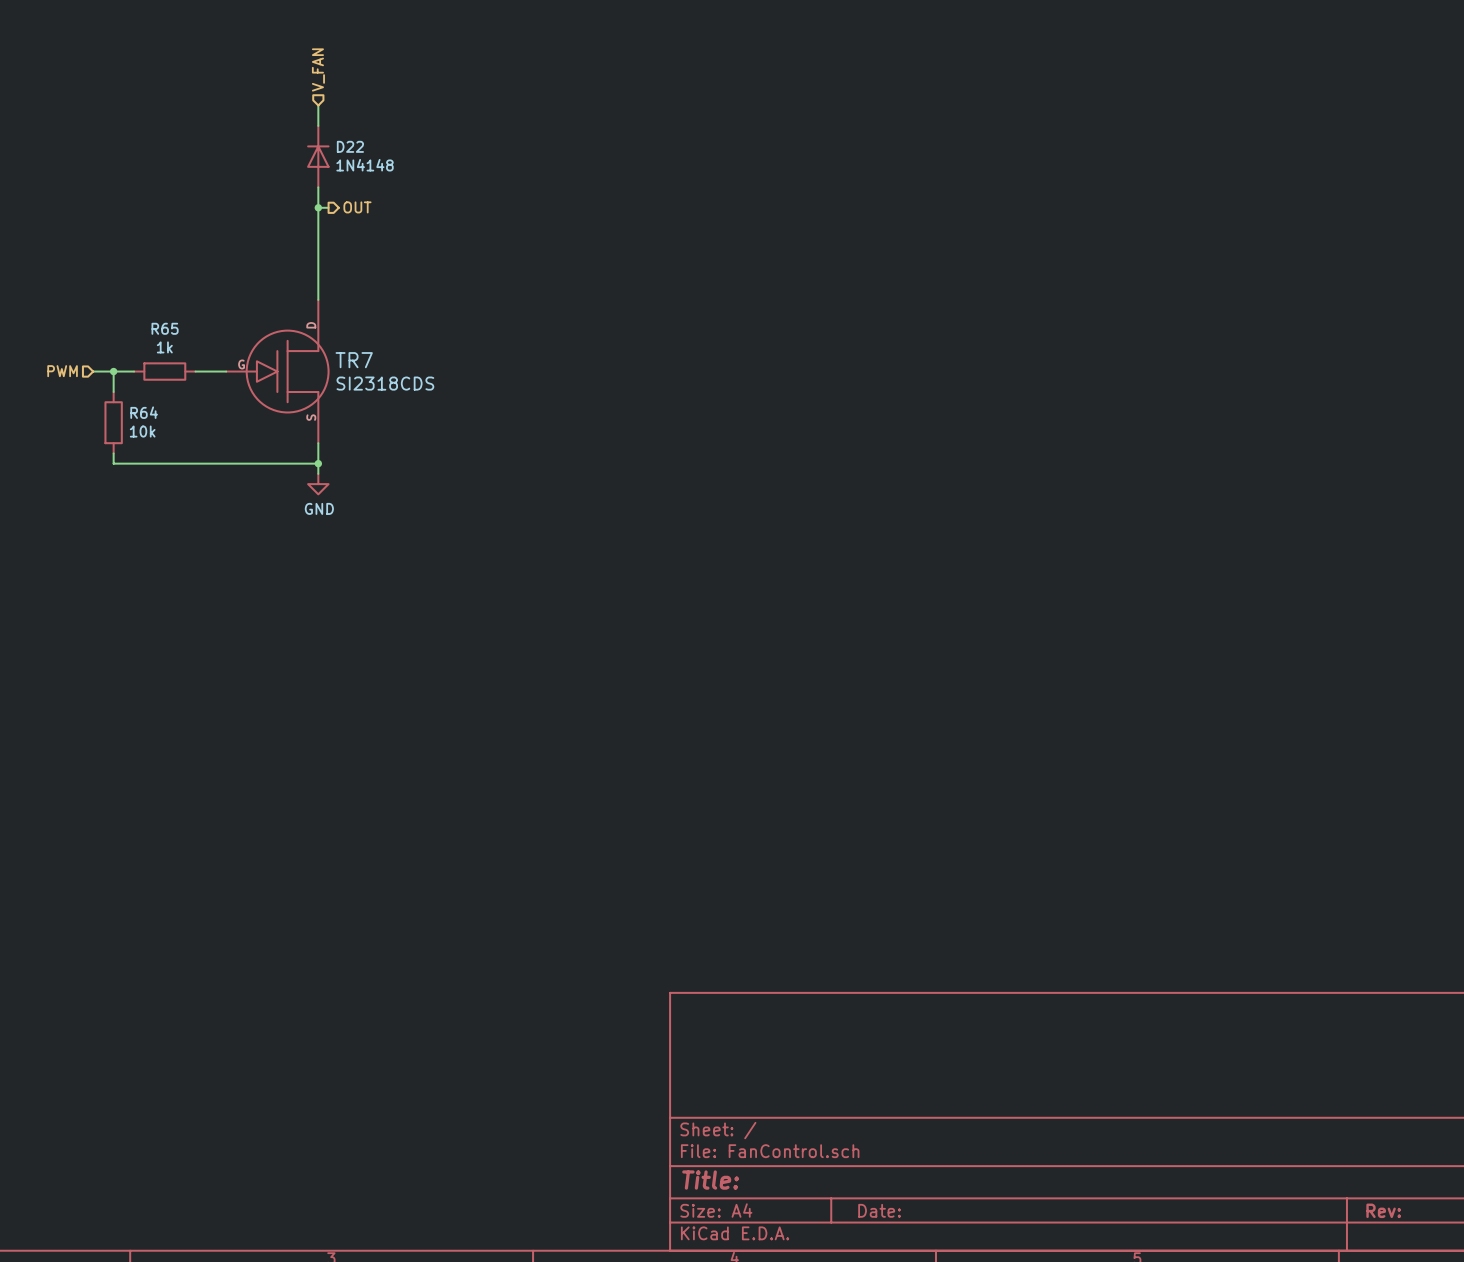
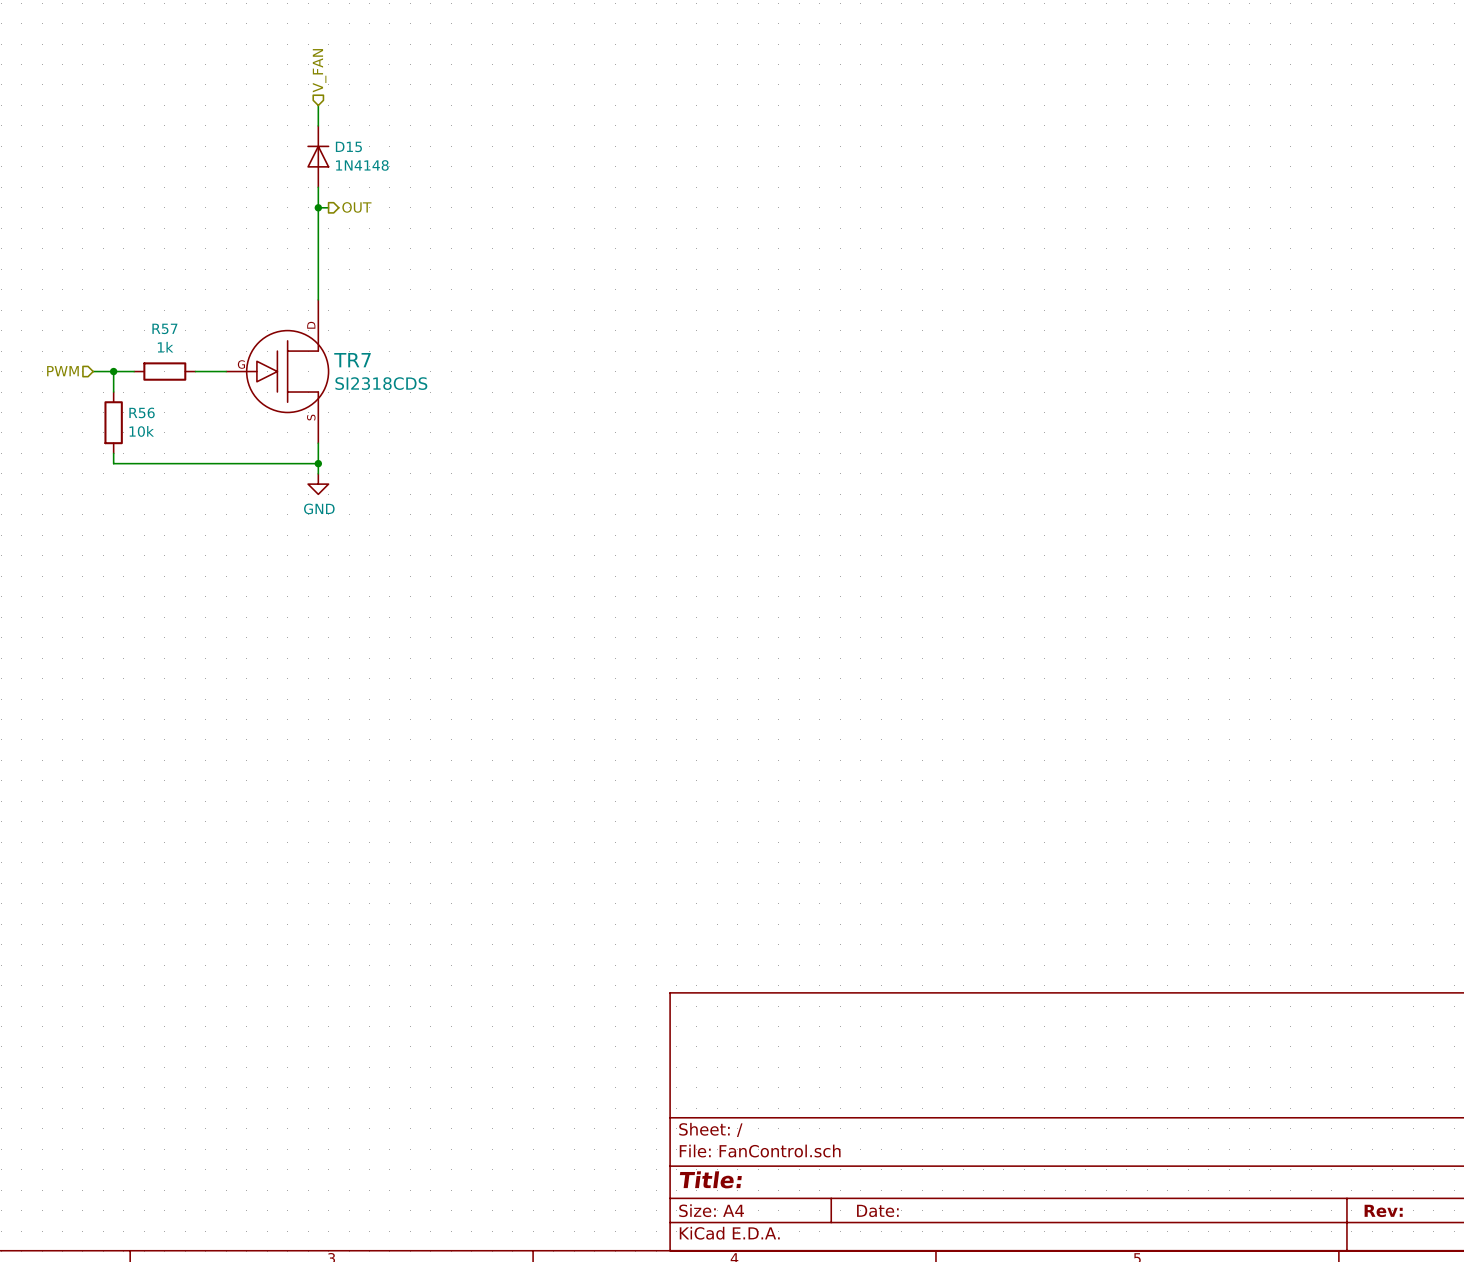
D22 name: D22 (350, 146) -> D15 (348, 146)
R65 name: R65 (165, 328) -> R57 (164, 328)
R64 name: R64 (144, 412) -> R56 (142, 412)

